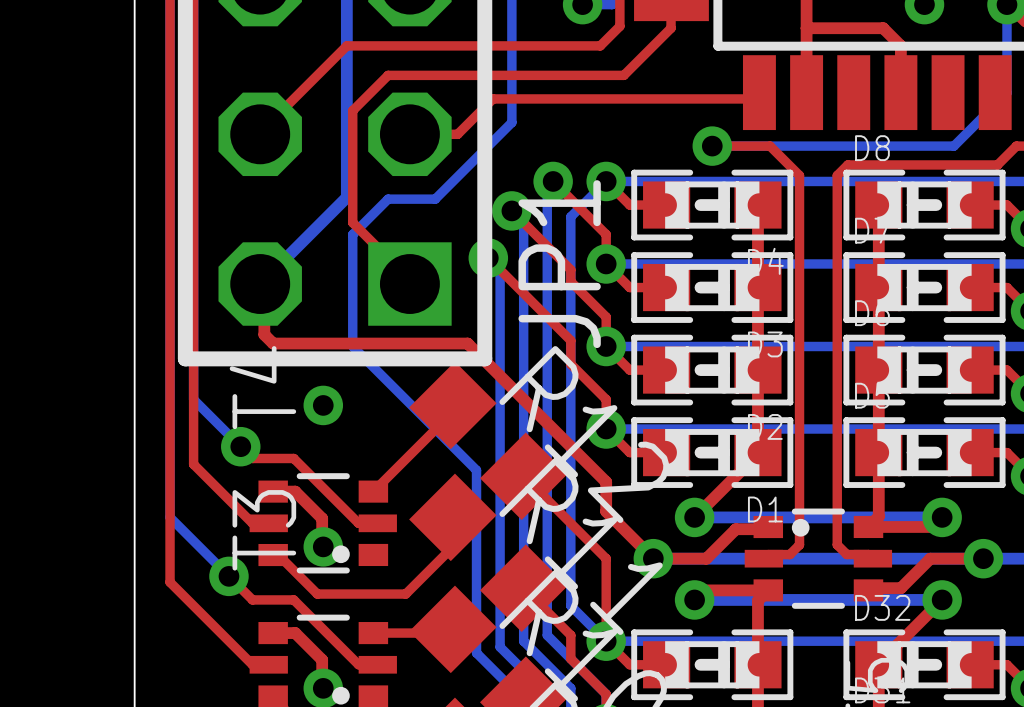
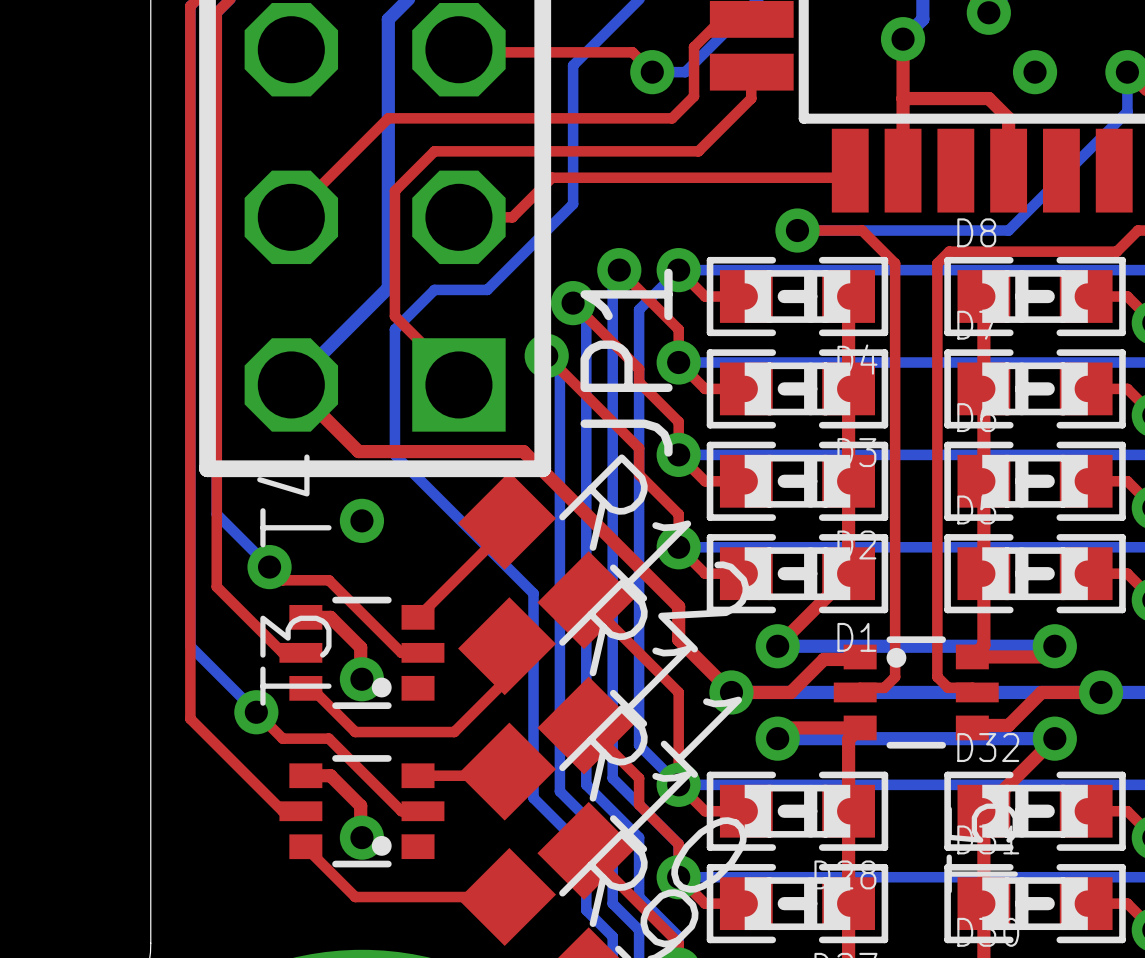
bottom track: (1006, 40) (1006, 93) (953, 146) (900, 146) -> (1127, 111) (1008, 230)
top track: (264, 287) (264, 334) (273, 343) (320, 343) -> (295, 388) (358, 451)

